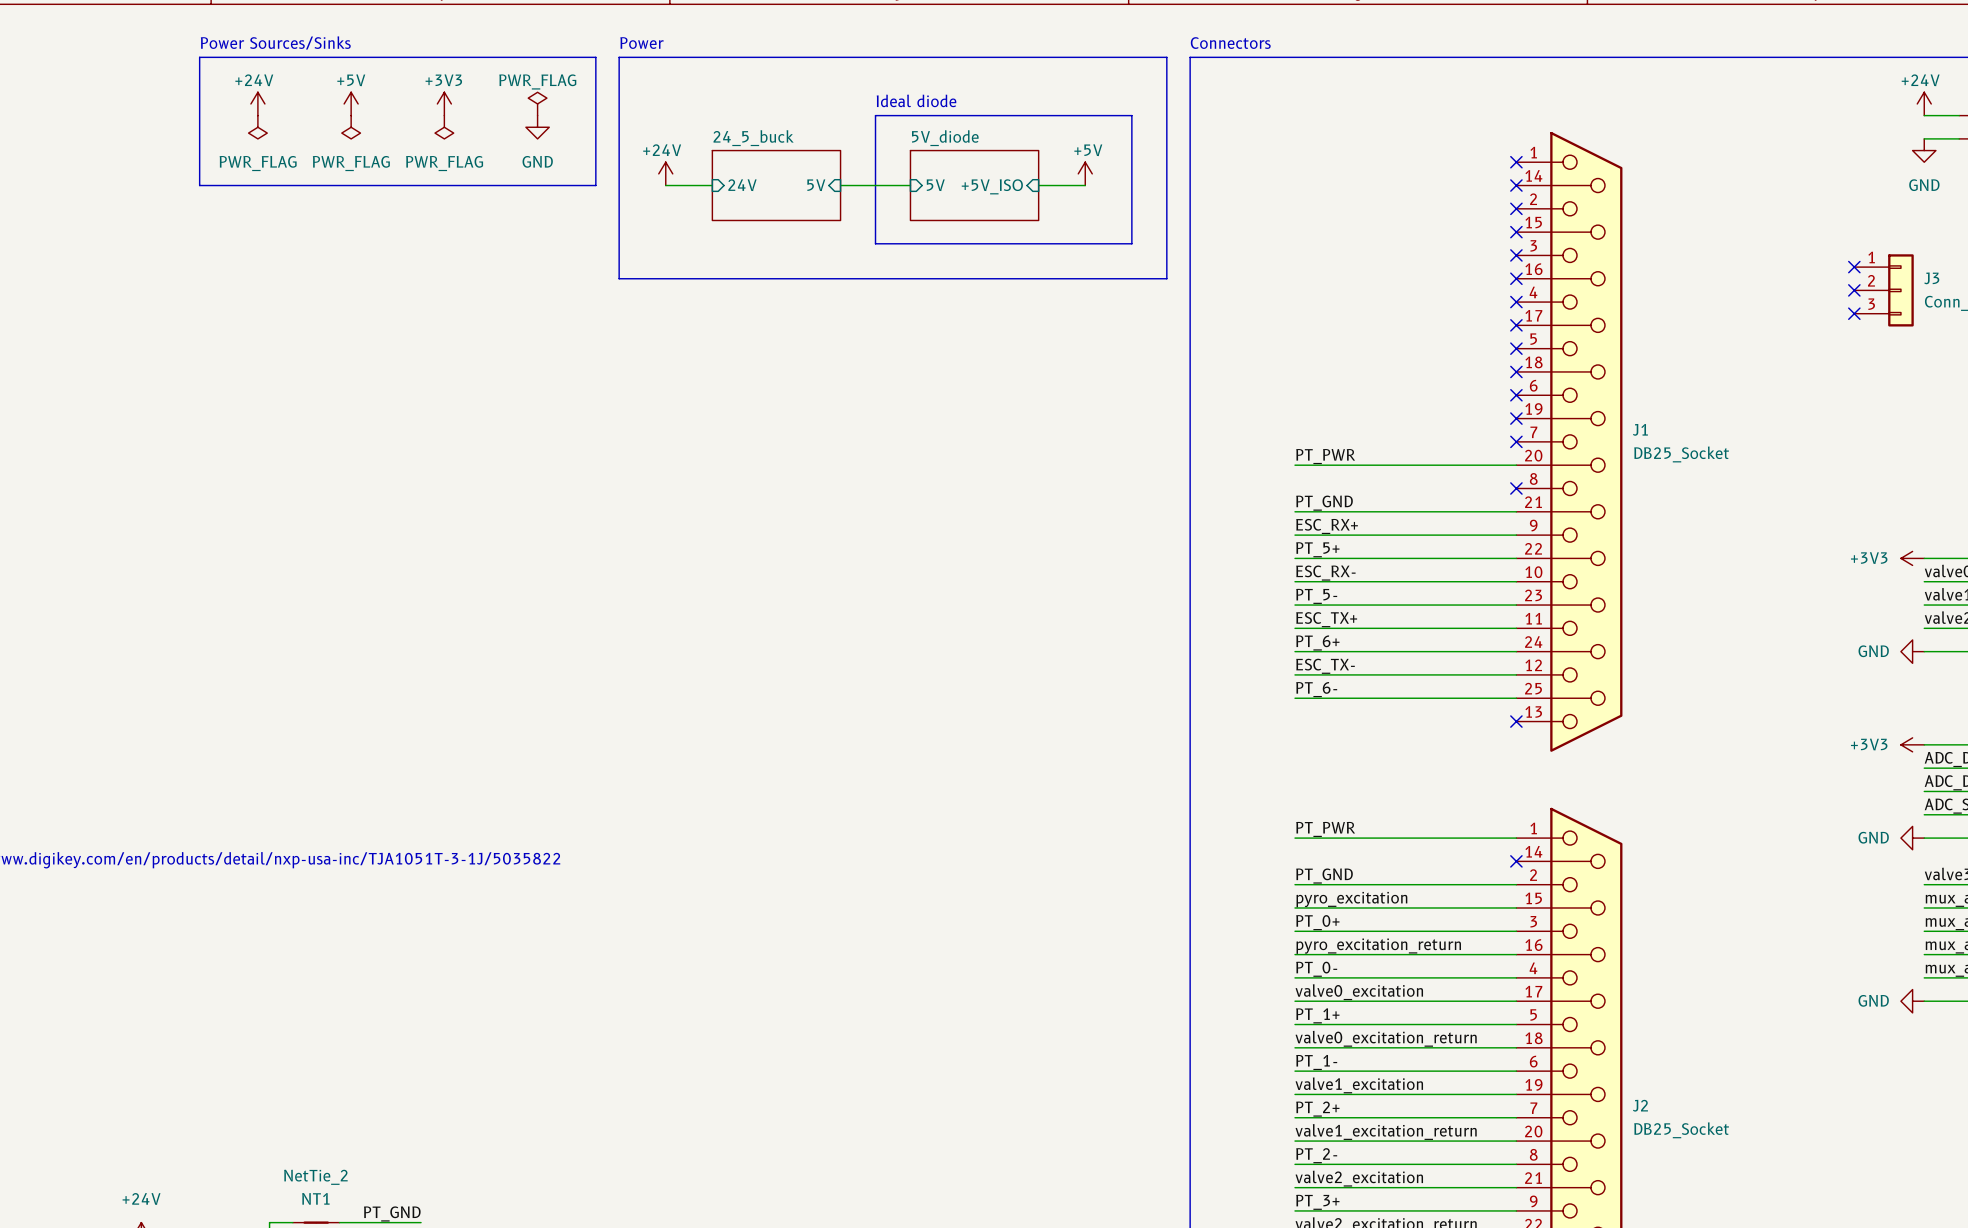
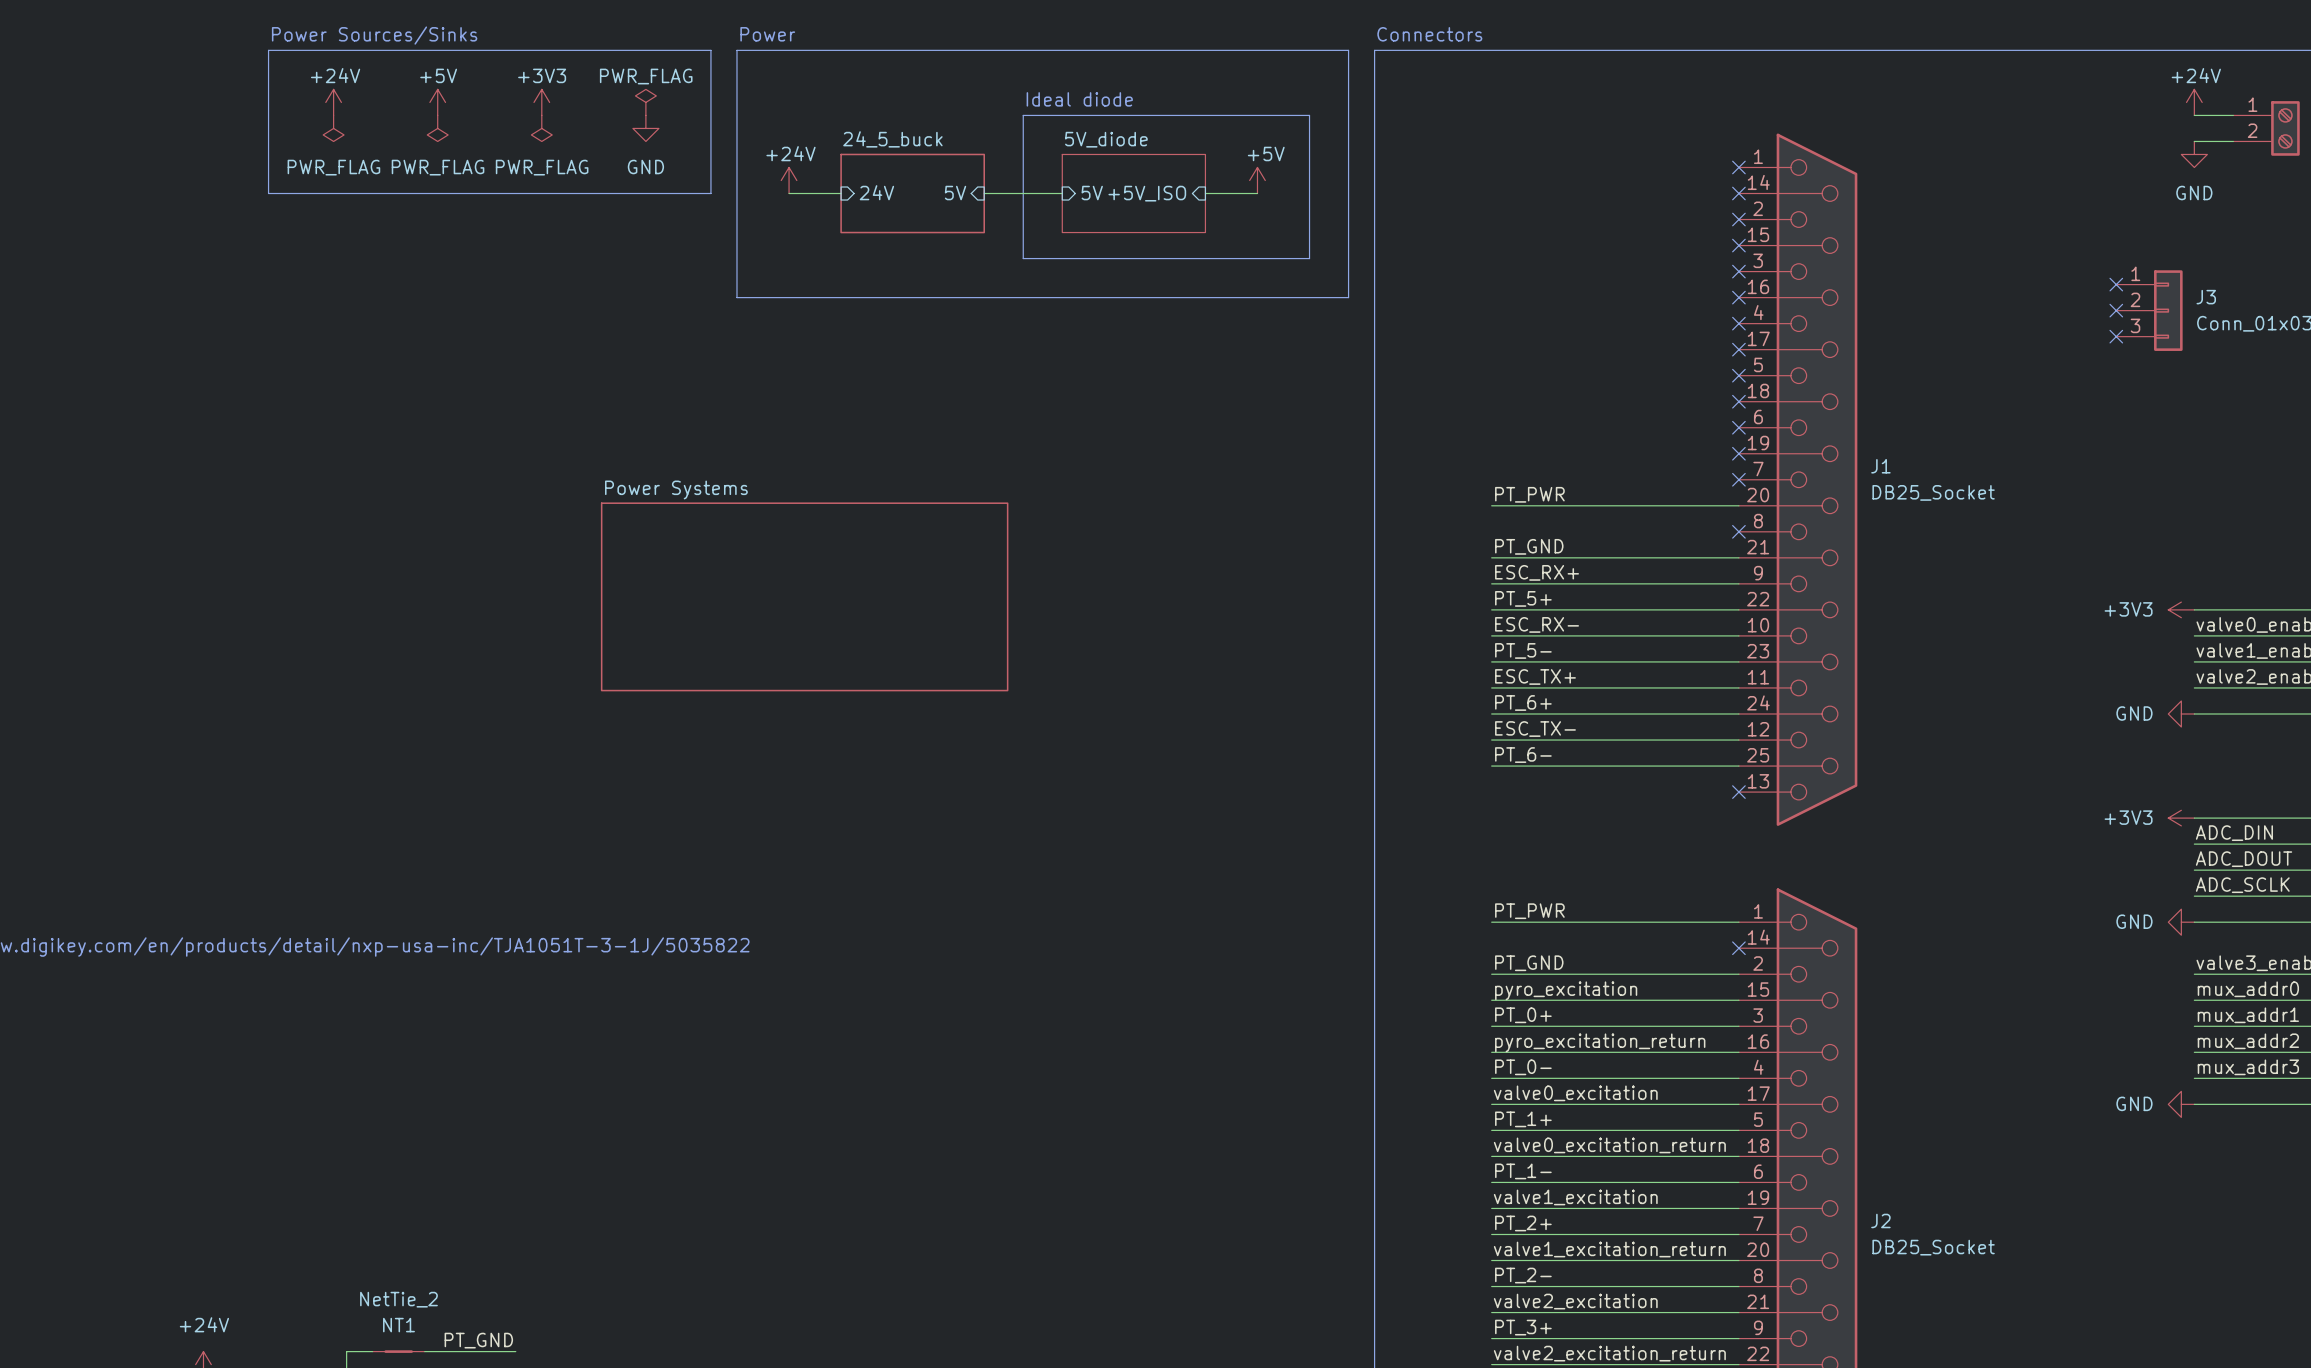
sheet Power Systems: none -> (804, 596)

